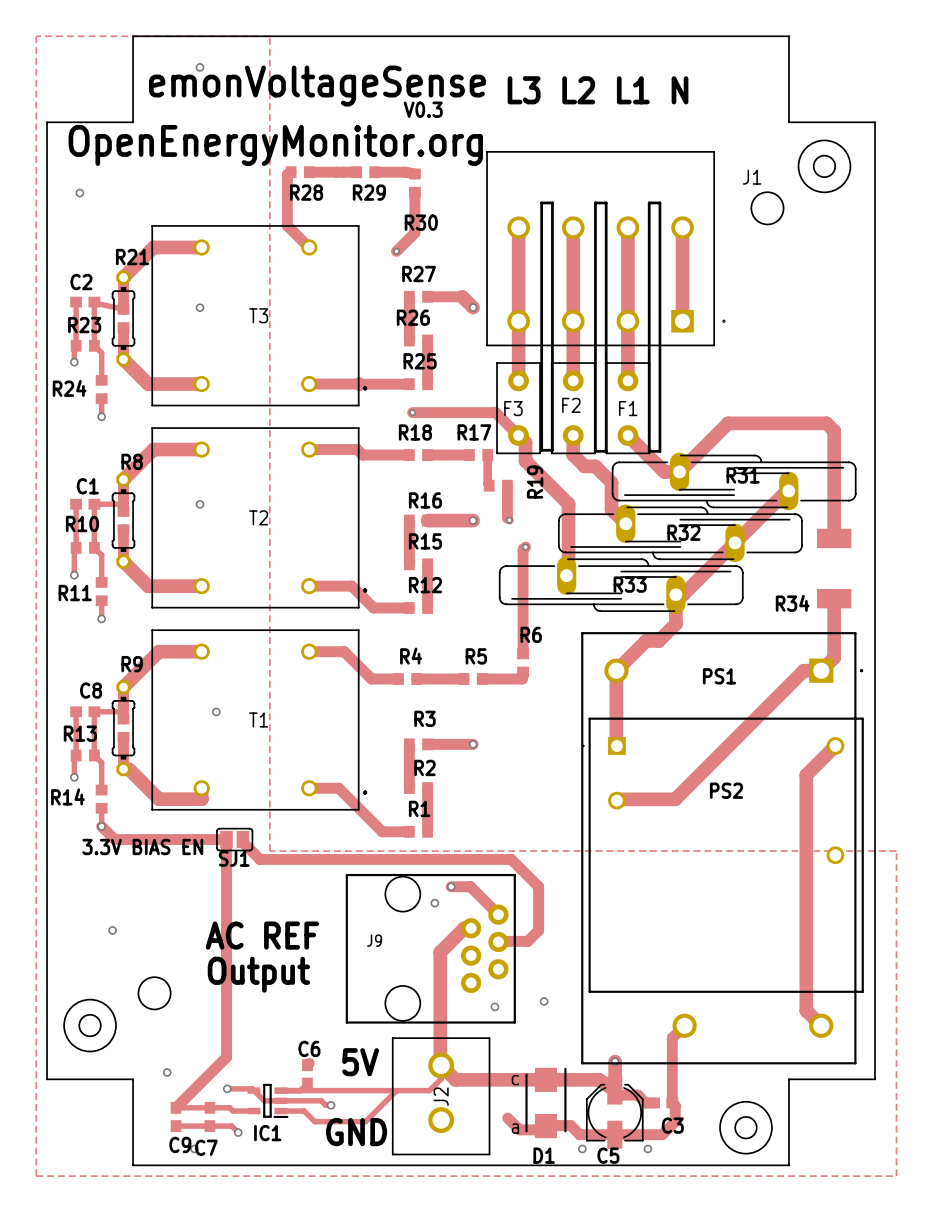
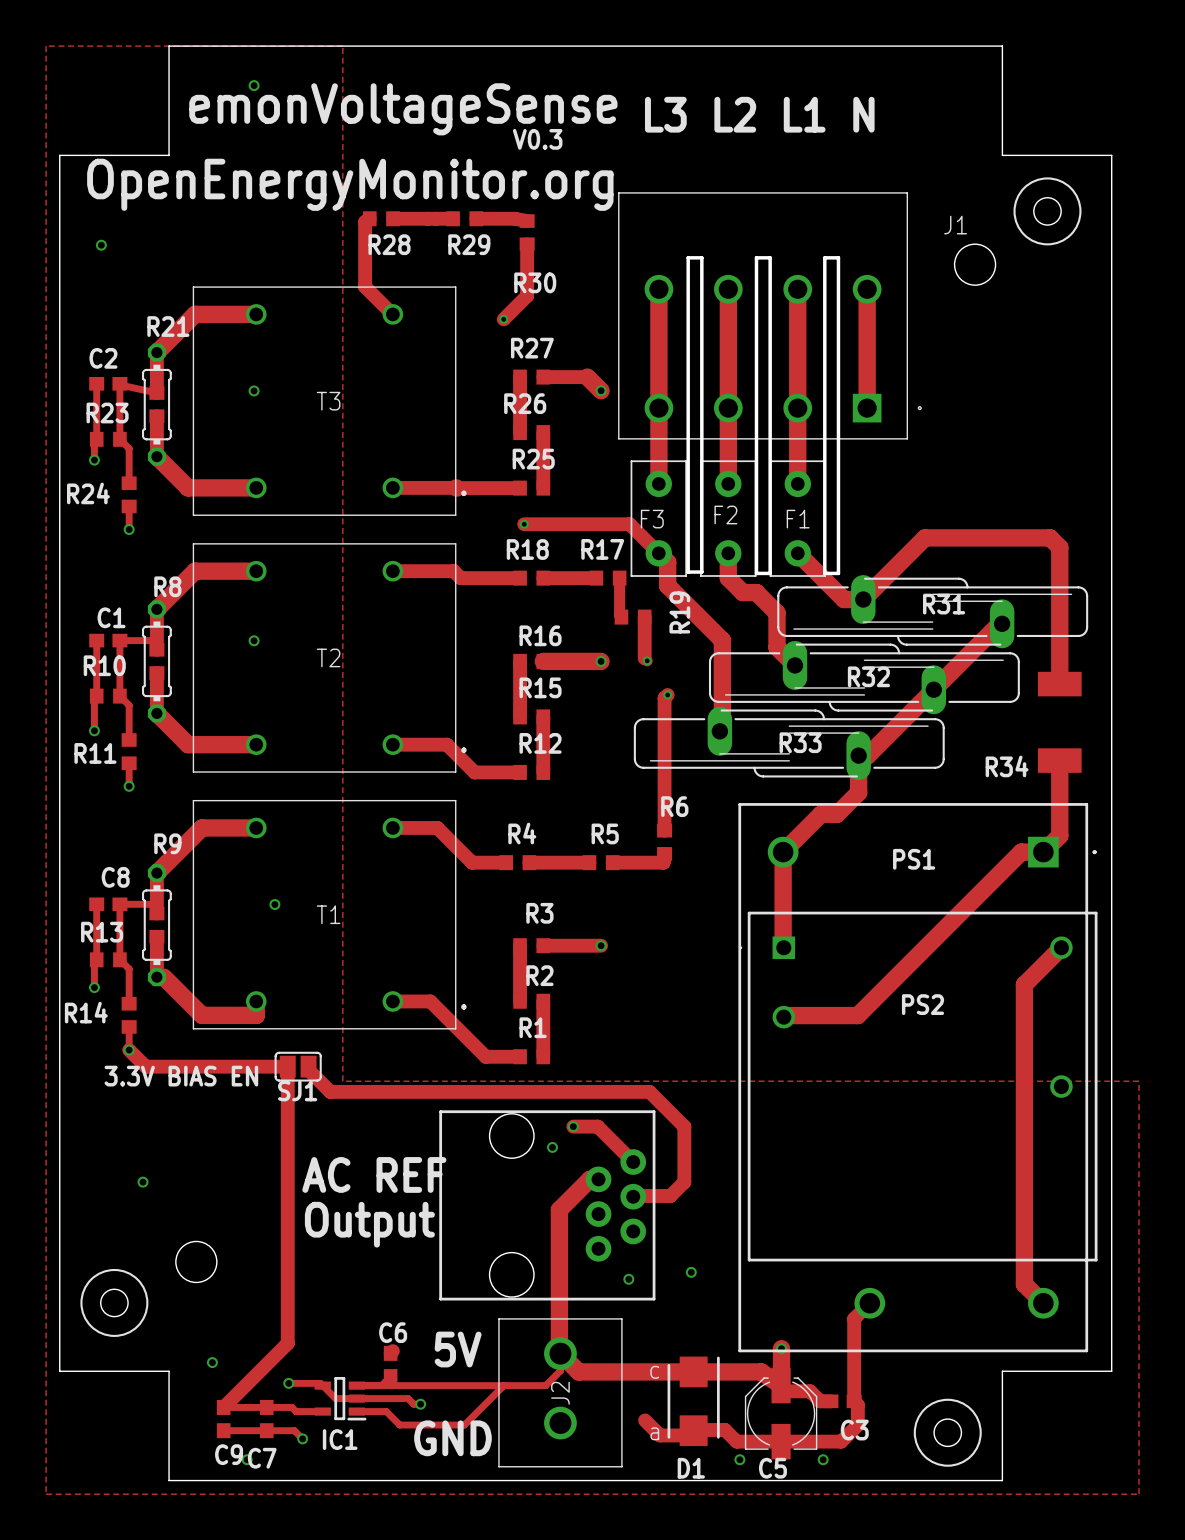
text position: AC REF (262, 935) -> AC REF (374, 1174)
part text: J9 (374, 940) -> none
text position: Output (258, 974) -> Output (369, 1224)

